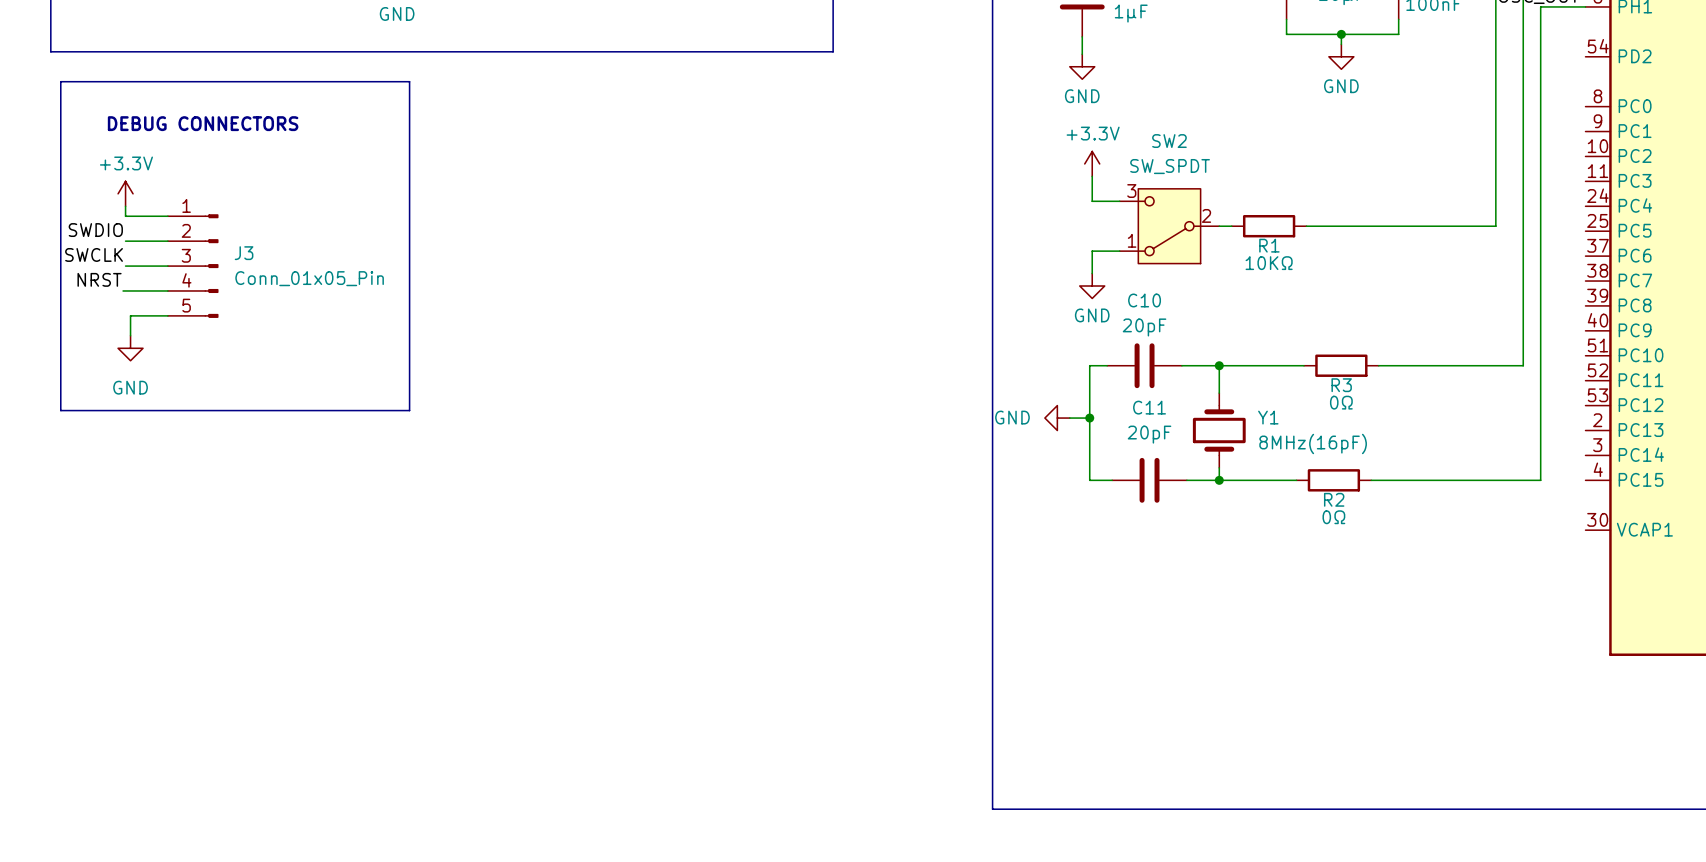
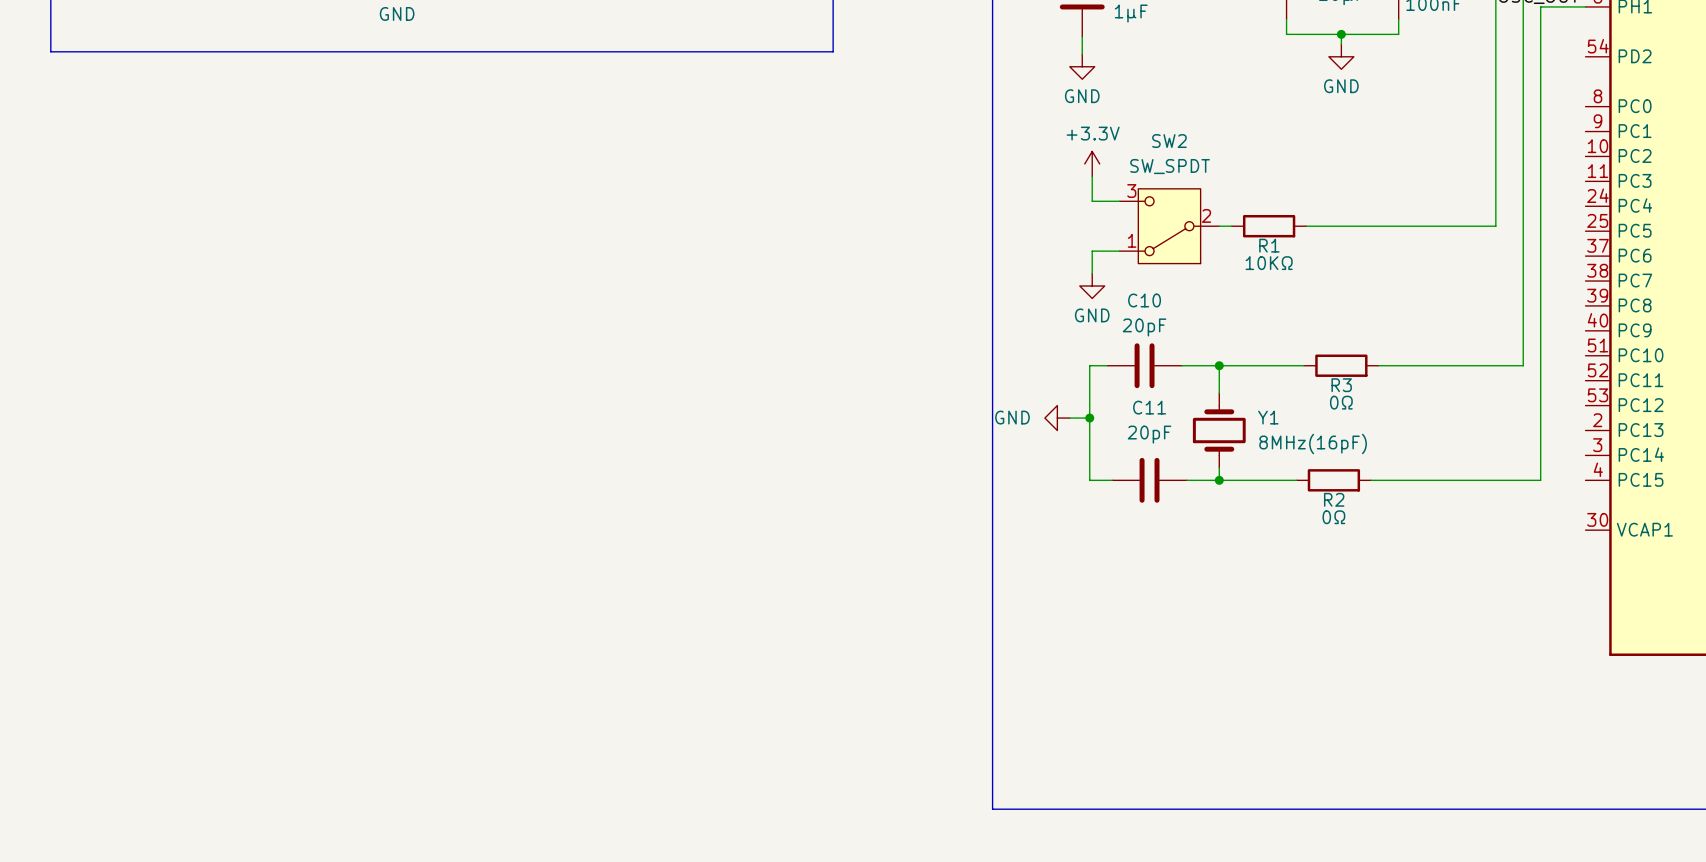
line: (60, 81) (409, 81) (409, 410) (60, 410) (60, 81) -> none
text: DEBUG CONNECTORS (203, 123) -> none
power symbol: +3.3V (125, 193) -> none
wire: (125, 206) (125, 216) (167, 216) -> none
label: SWDIO (95, 230) -> none
wire: (125, 241) (167, 241) -> none
label: SWCLK (94, 254) -> none
wire: (125, 266) (167, 266) -> none
J3: Conn_01x05_Pin (193, 266) -> none
label: NRST (99, 279) -> none
wire: (123, 290) (167, 290) -> none
wire: (167, 315) (130, 315) (130, 335) -> none
power symbol: GND (130, 348) -> none

